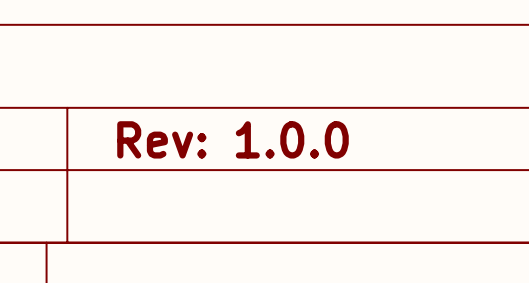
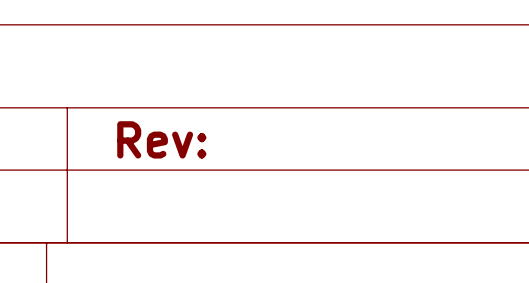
title block: Rev: 1.0.0 (232, 139) -> Rev: (161, 139)

